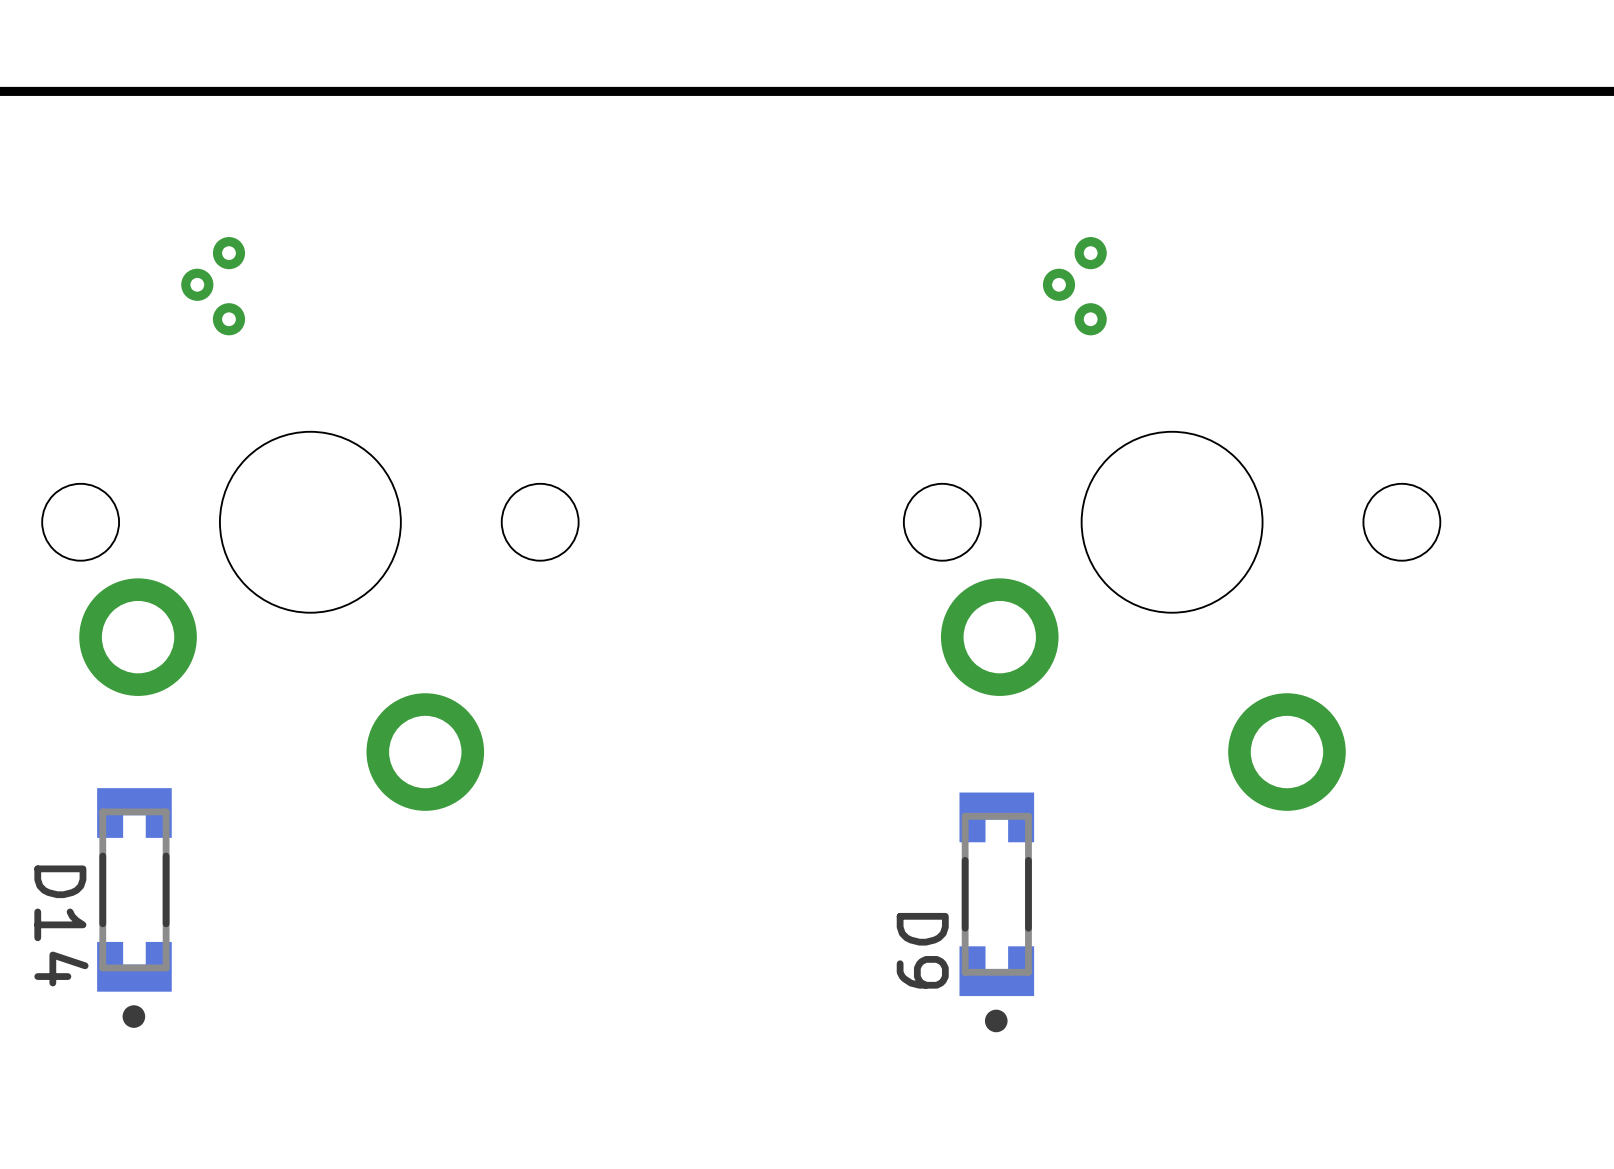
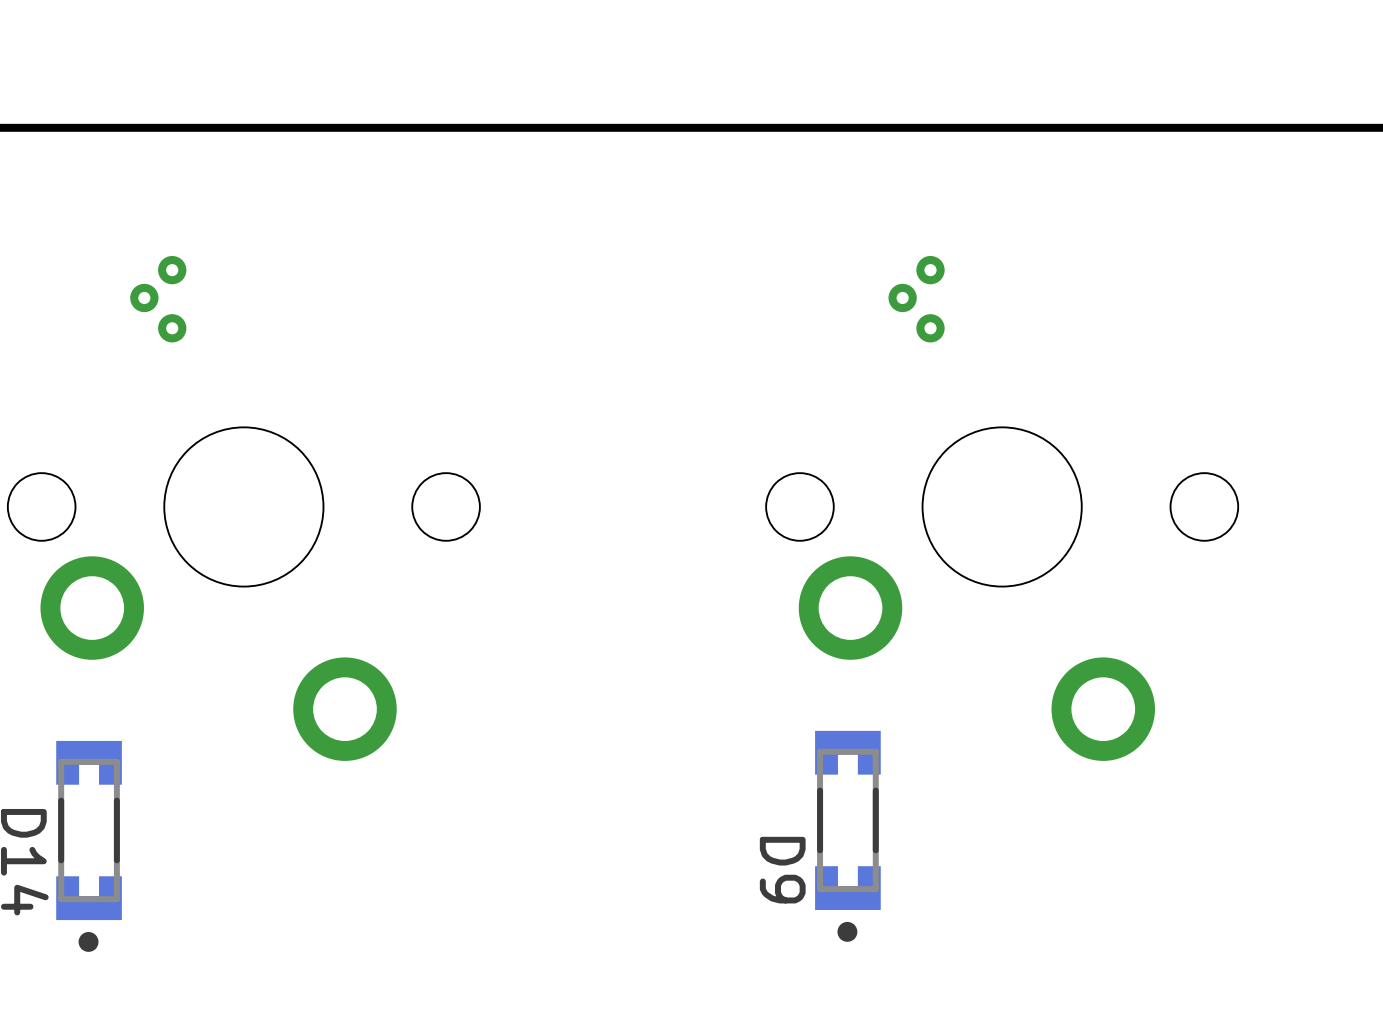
D9 position: (996, 912) -> (847, 836)

